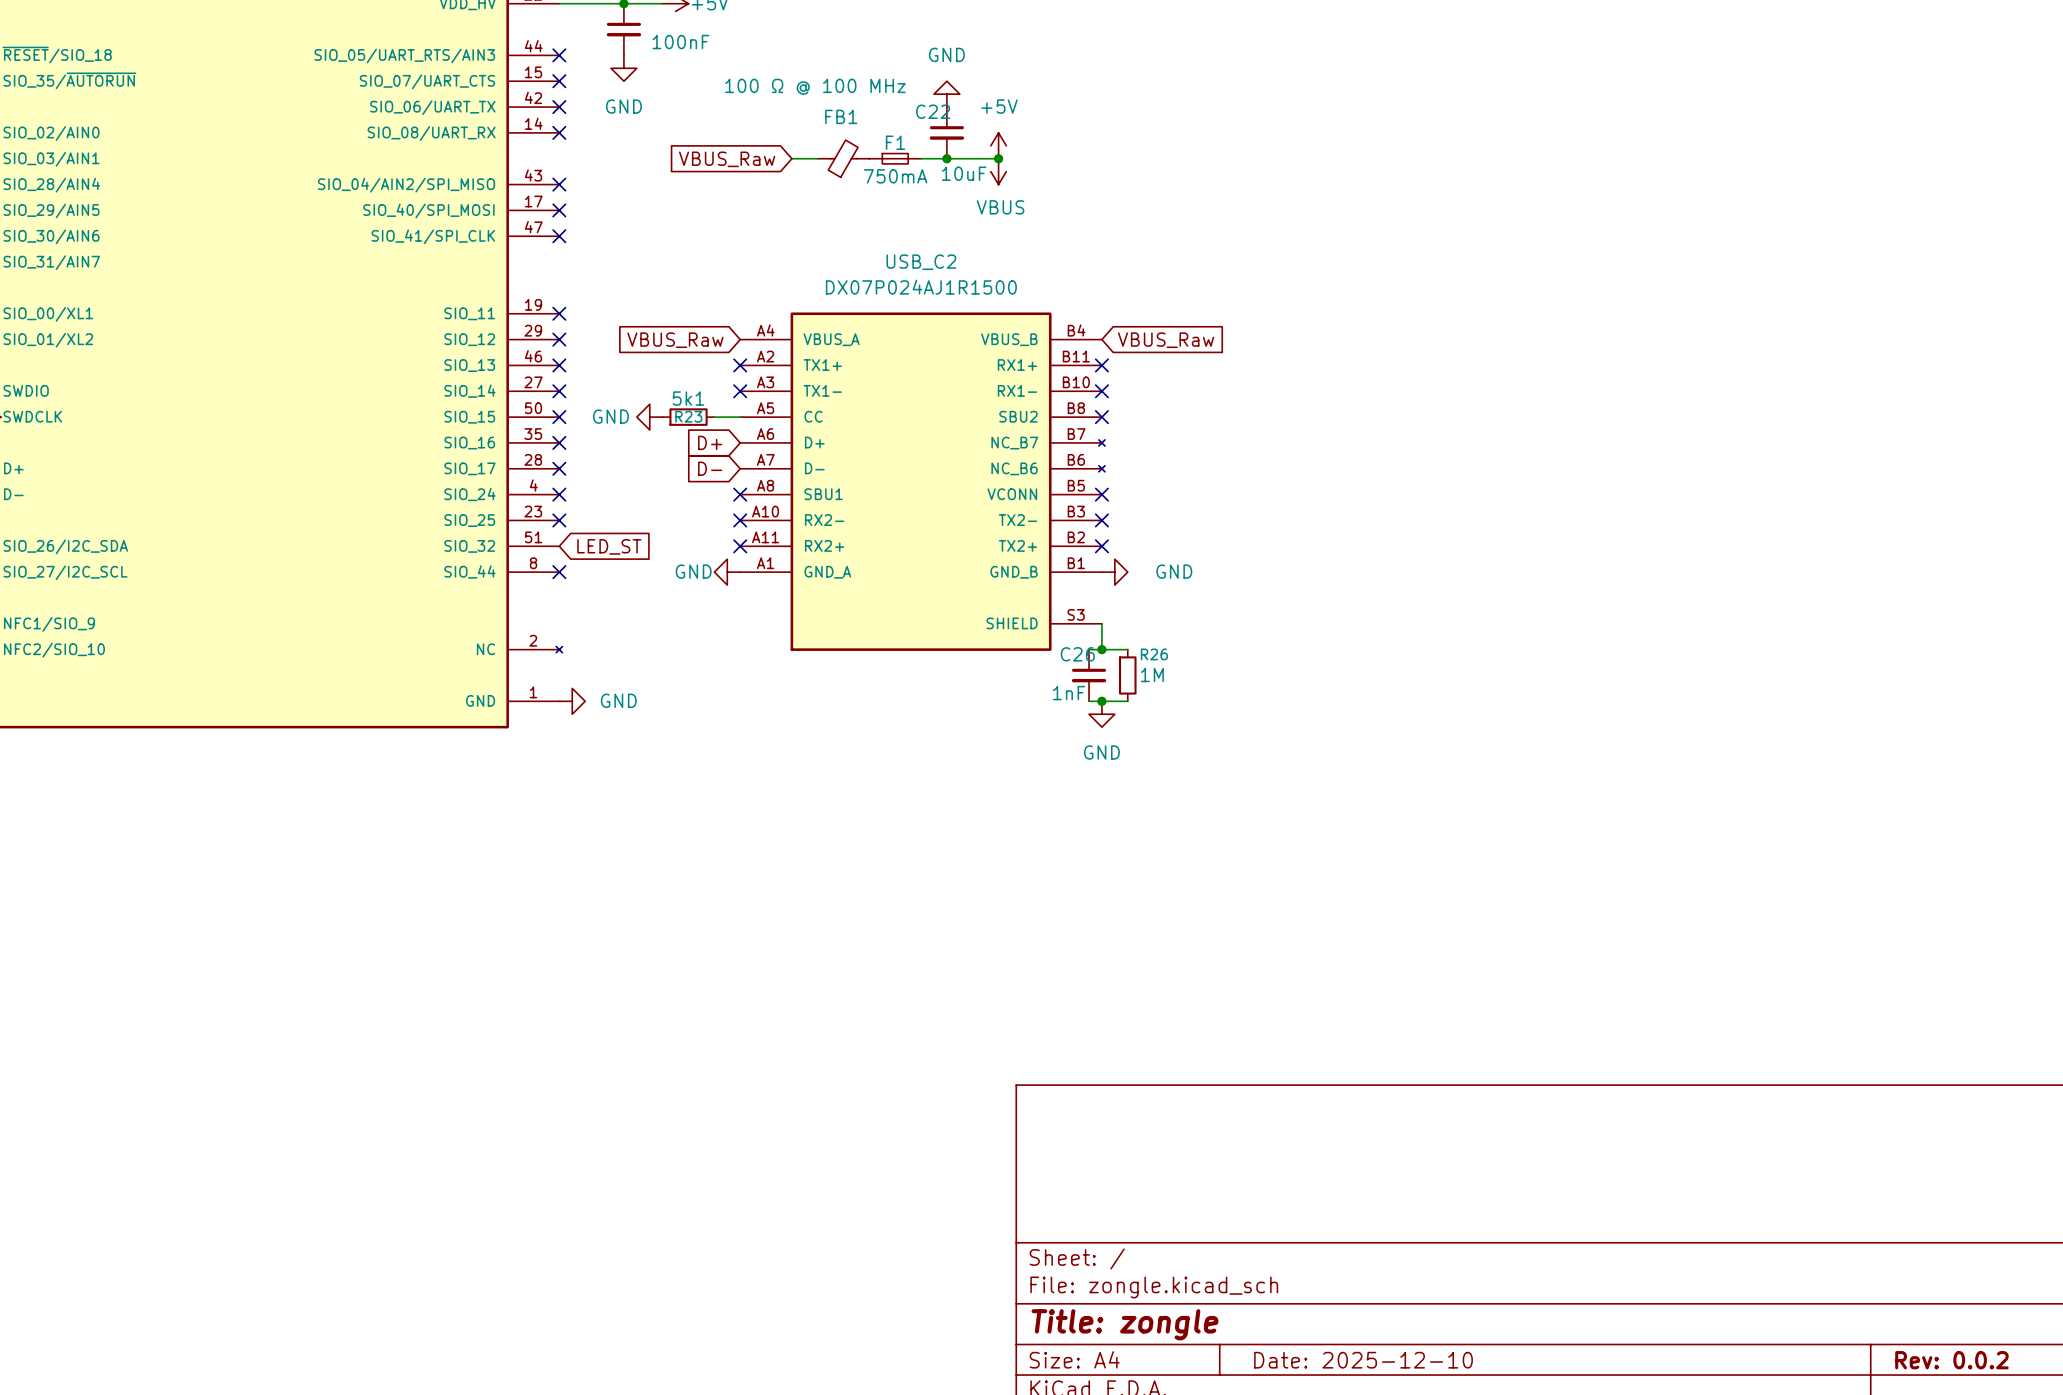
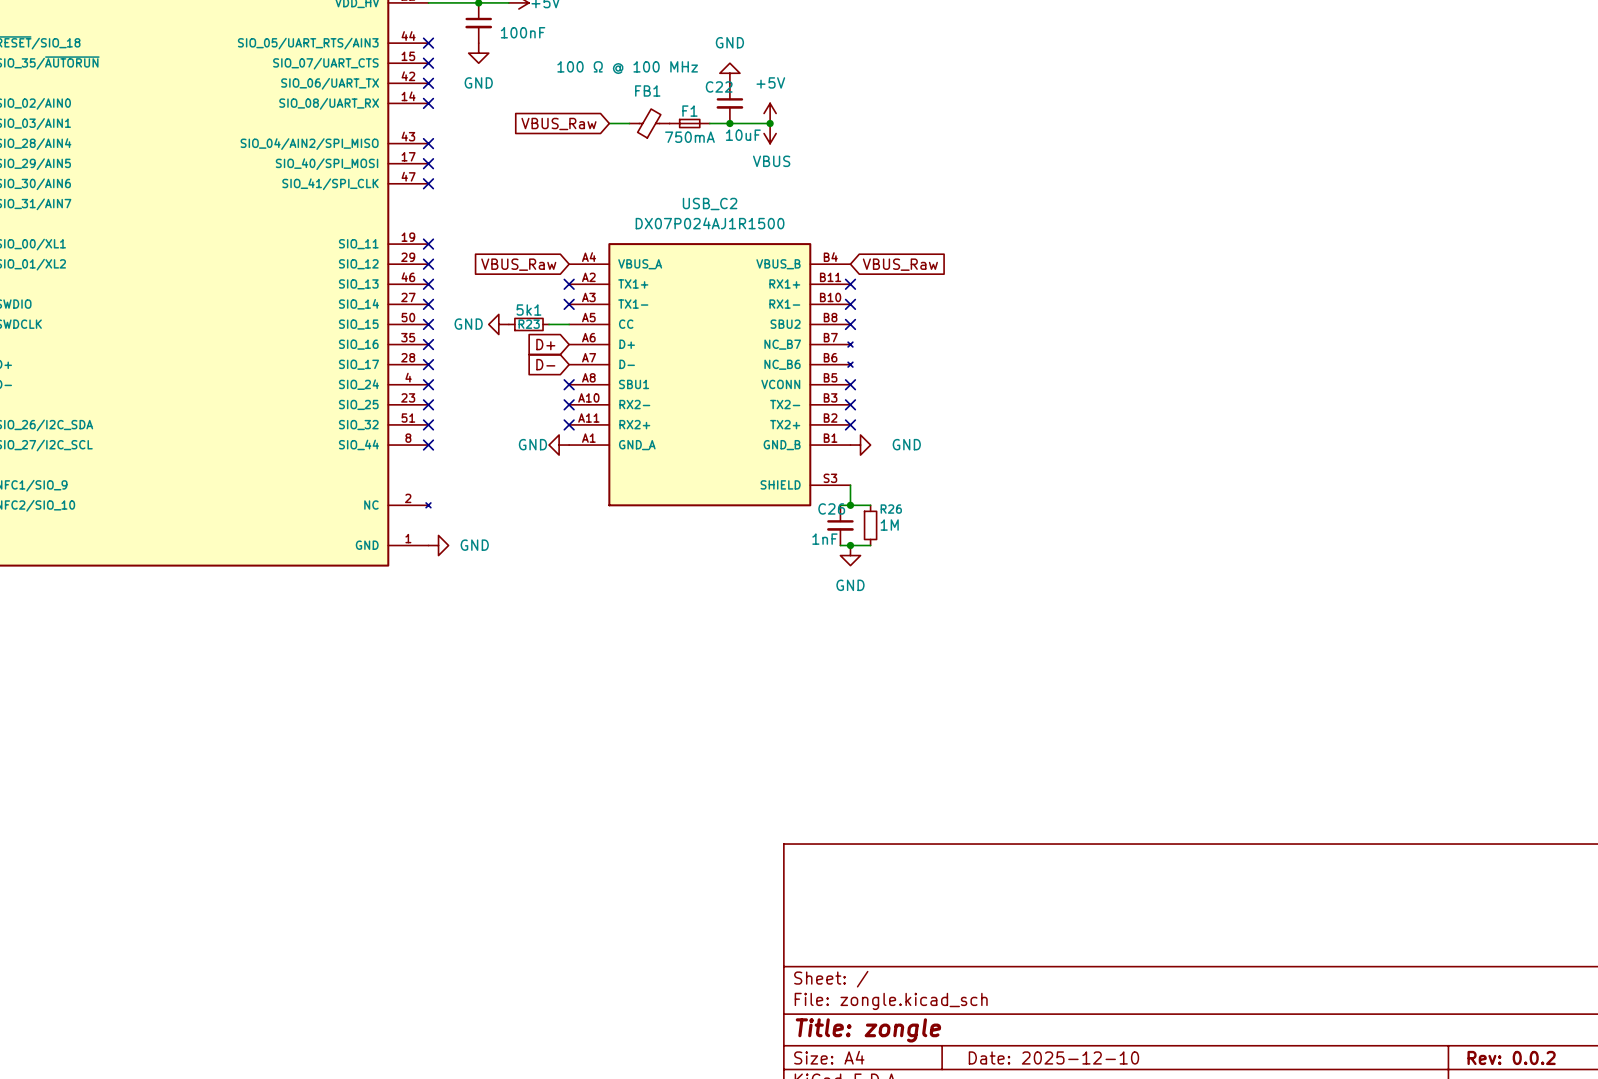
no-connect mark: none -> (428, 424)
global label: LED_ST (609, 546) -> none

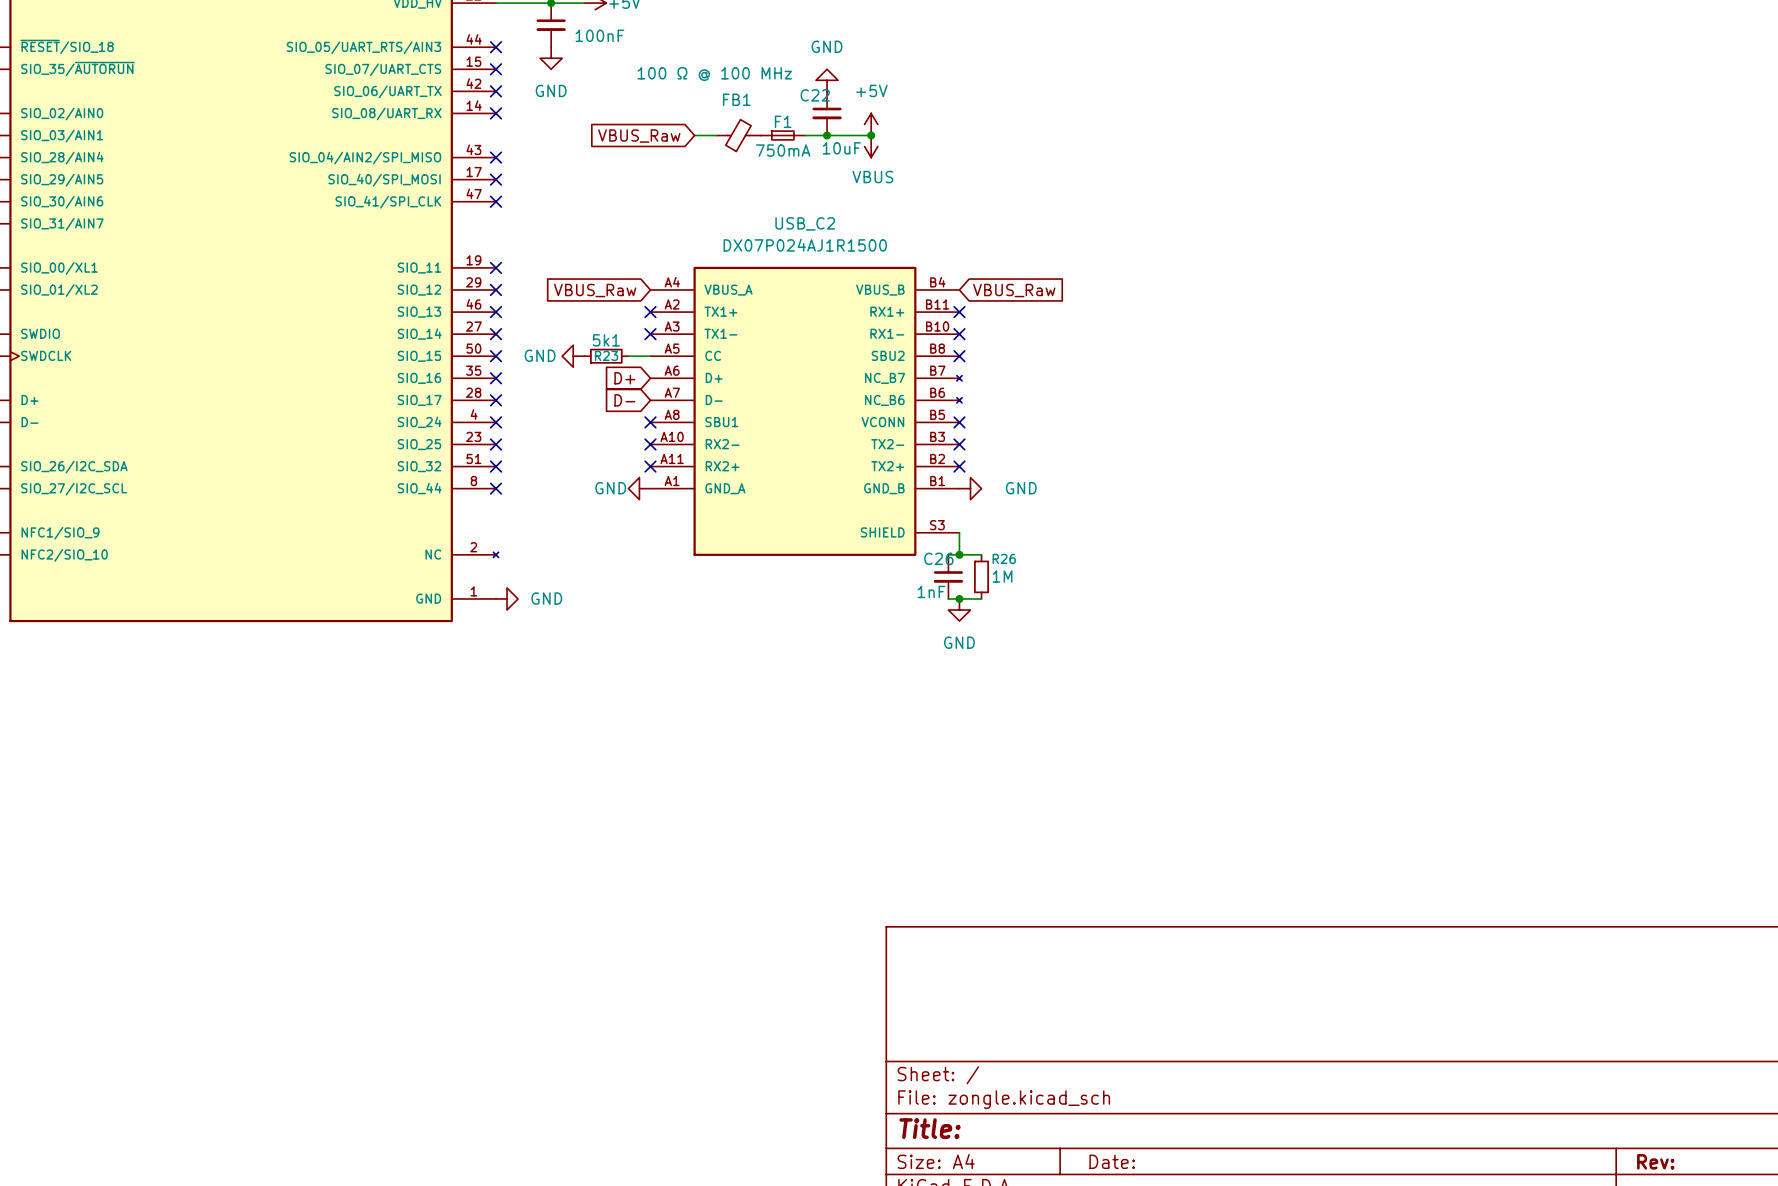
title block: Title: zongle (868, 1030) -> Title: (930, 1128)
title block: Date: 2025-12-10 (1053, 1057) -> Date: (1112, 1161)
title block: Rev: 0.0.2 (1511, 1057) -> Rev: (1655, 1161)

